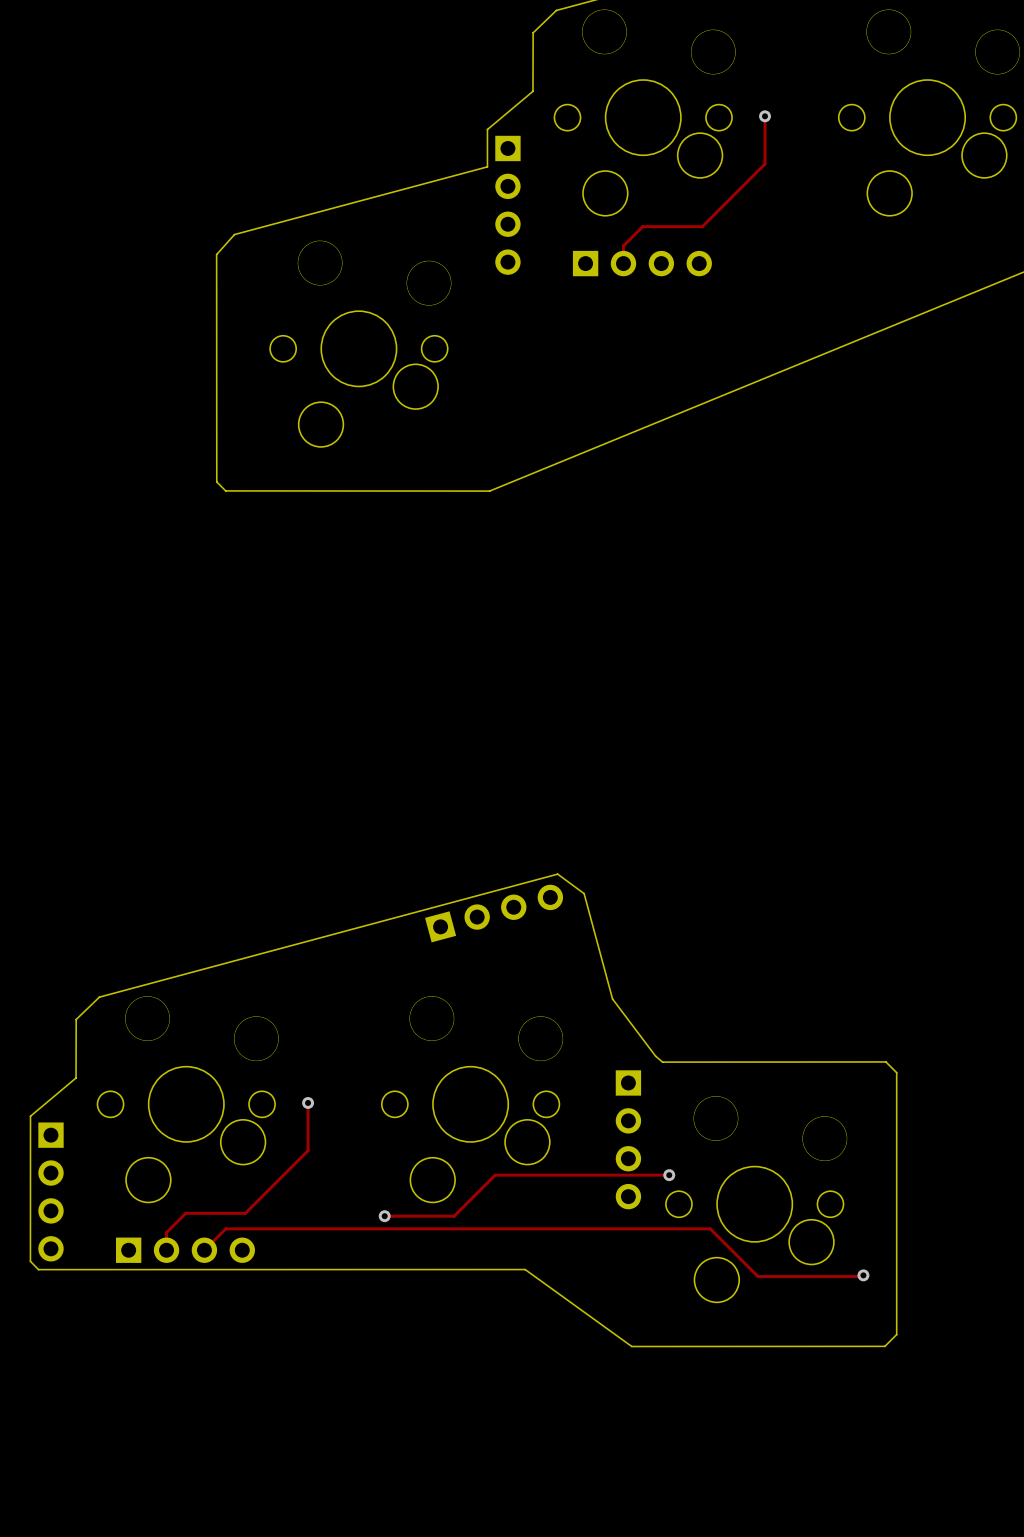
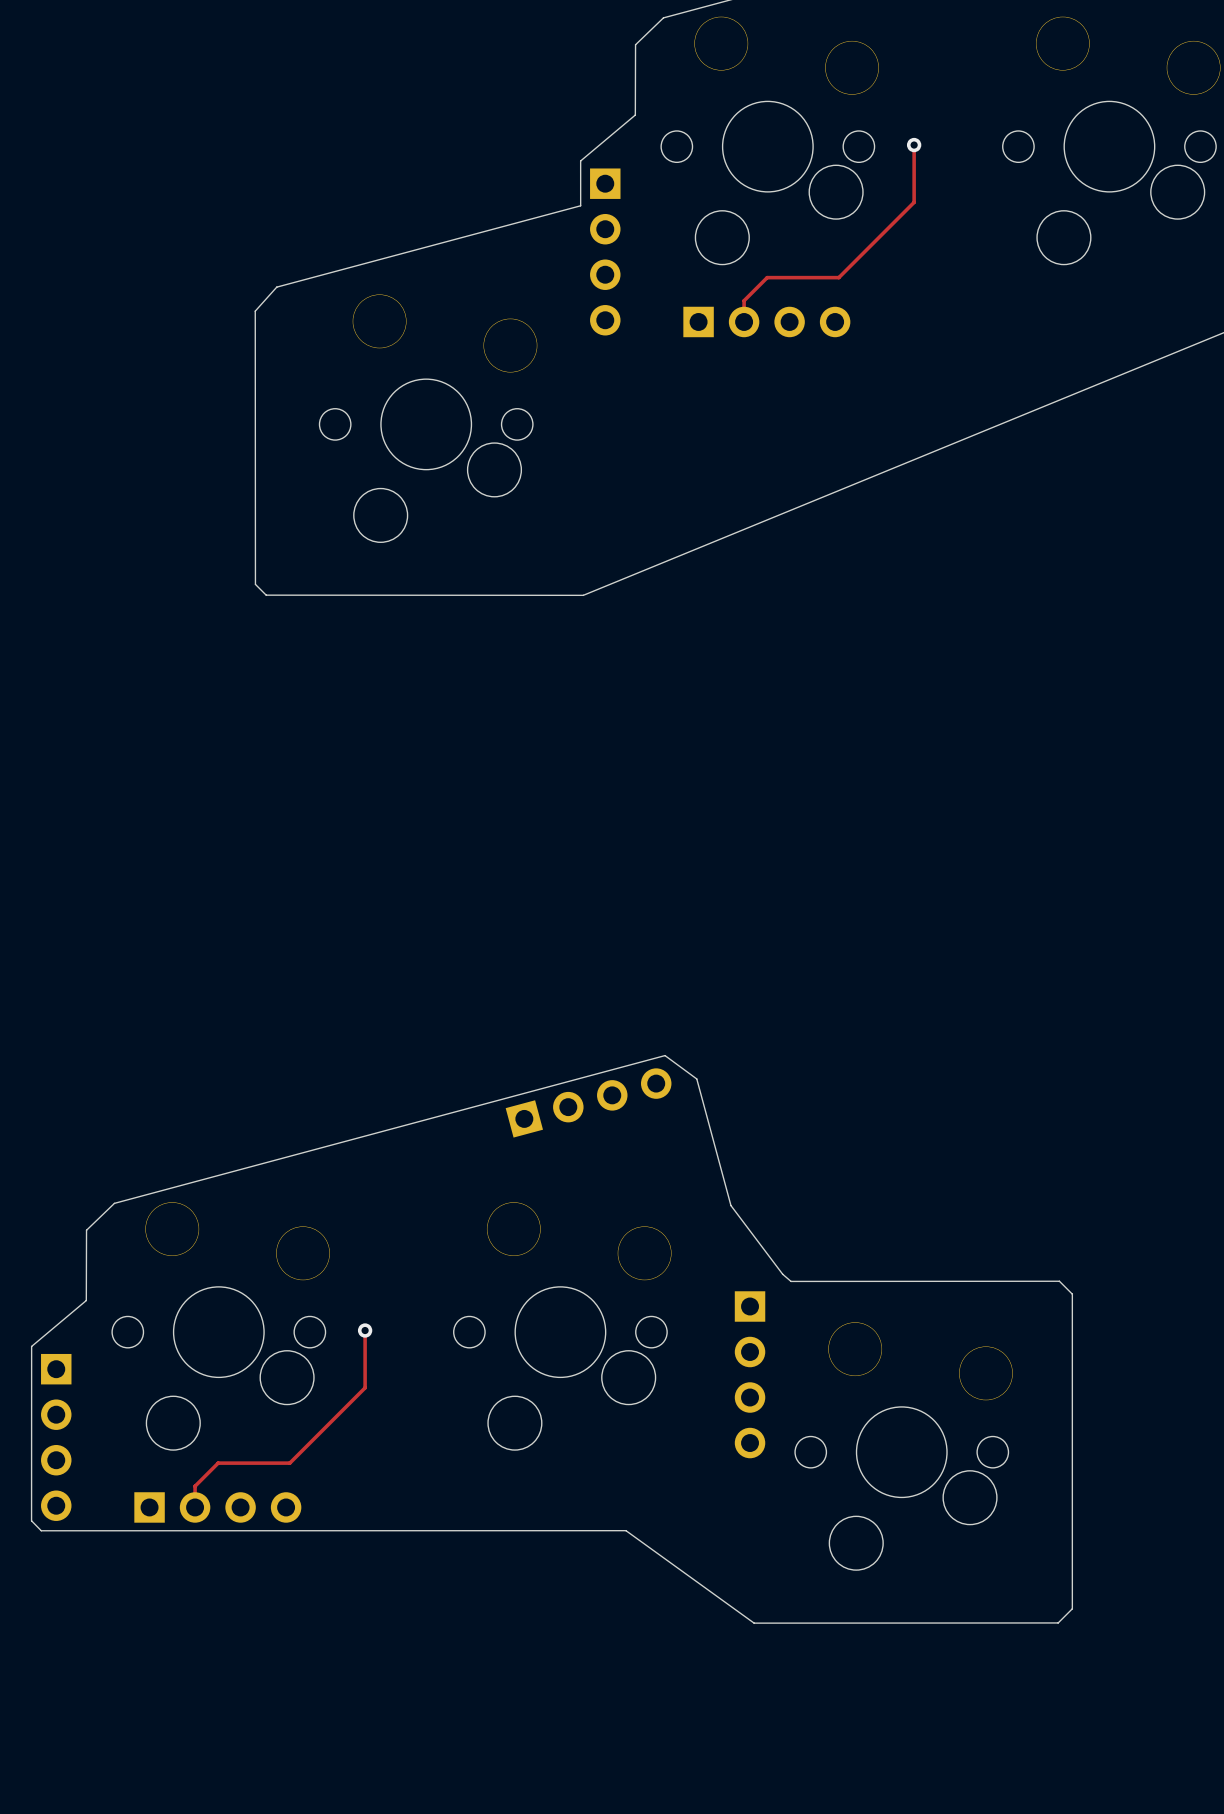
track: (669, 1175) (495, 1175) (454, 1216) (384, 1216) -> none
via: (669, 1175) -> none
via: (384, 1216) -> none
track: (204, 1250) (225, 1228) (710, 1228) (757, 1276) (863, 1275) -> none
via: (863, 1275) -> none

